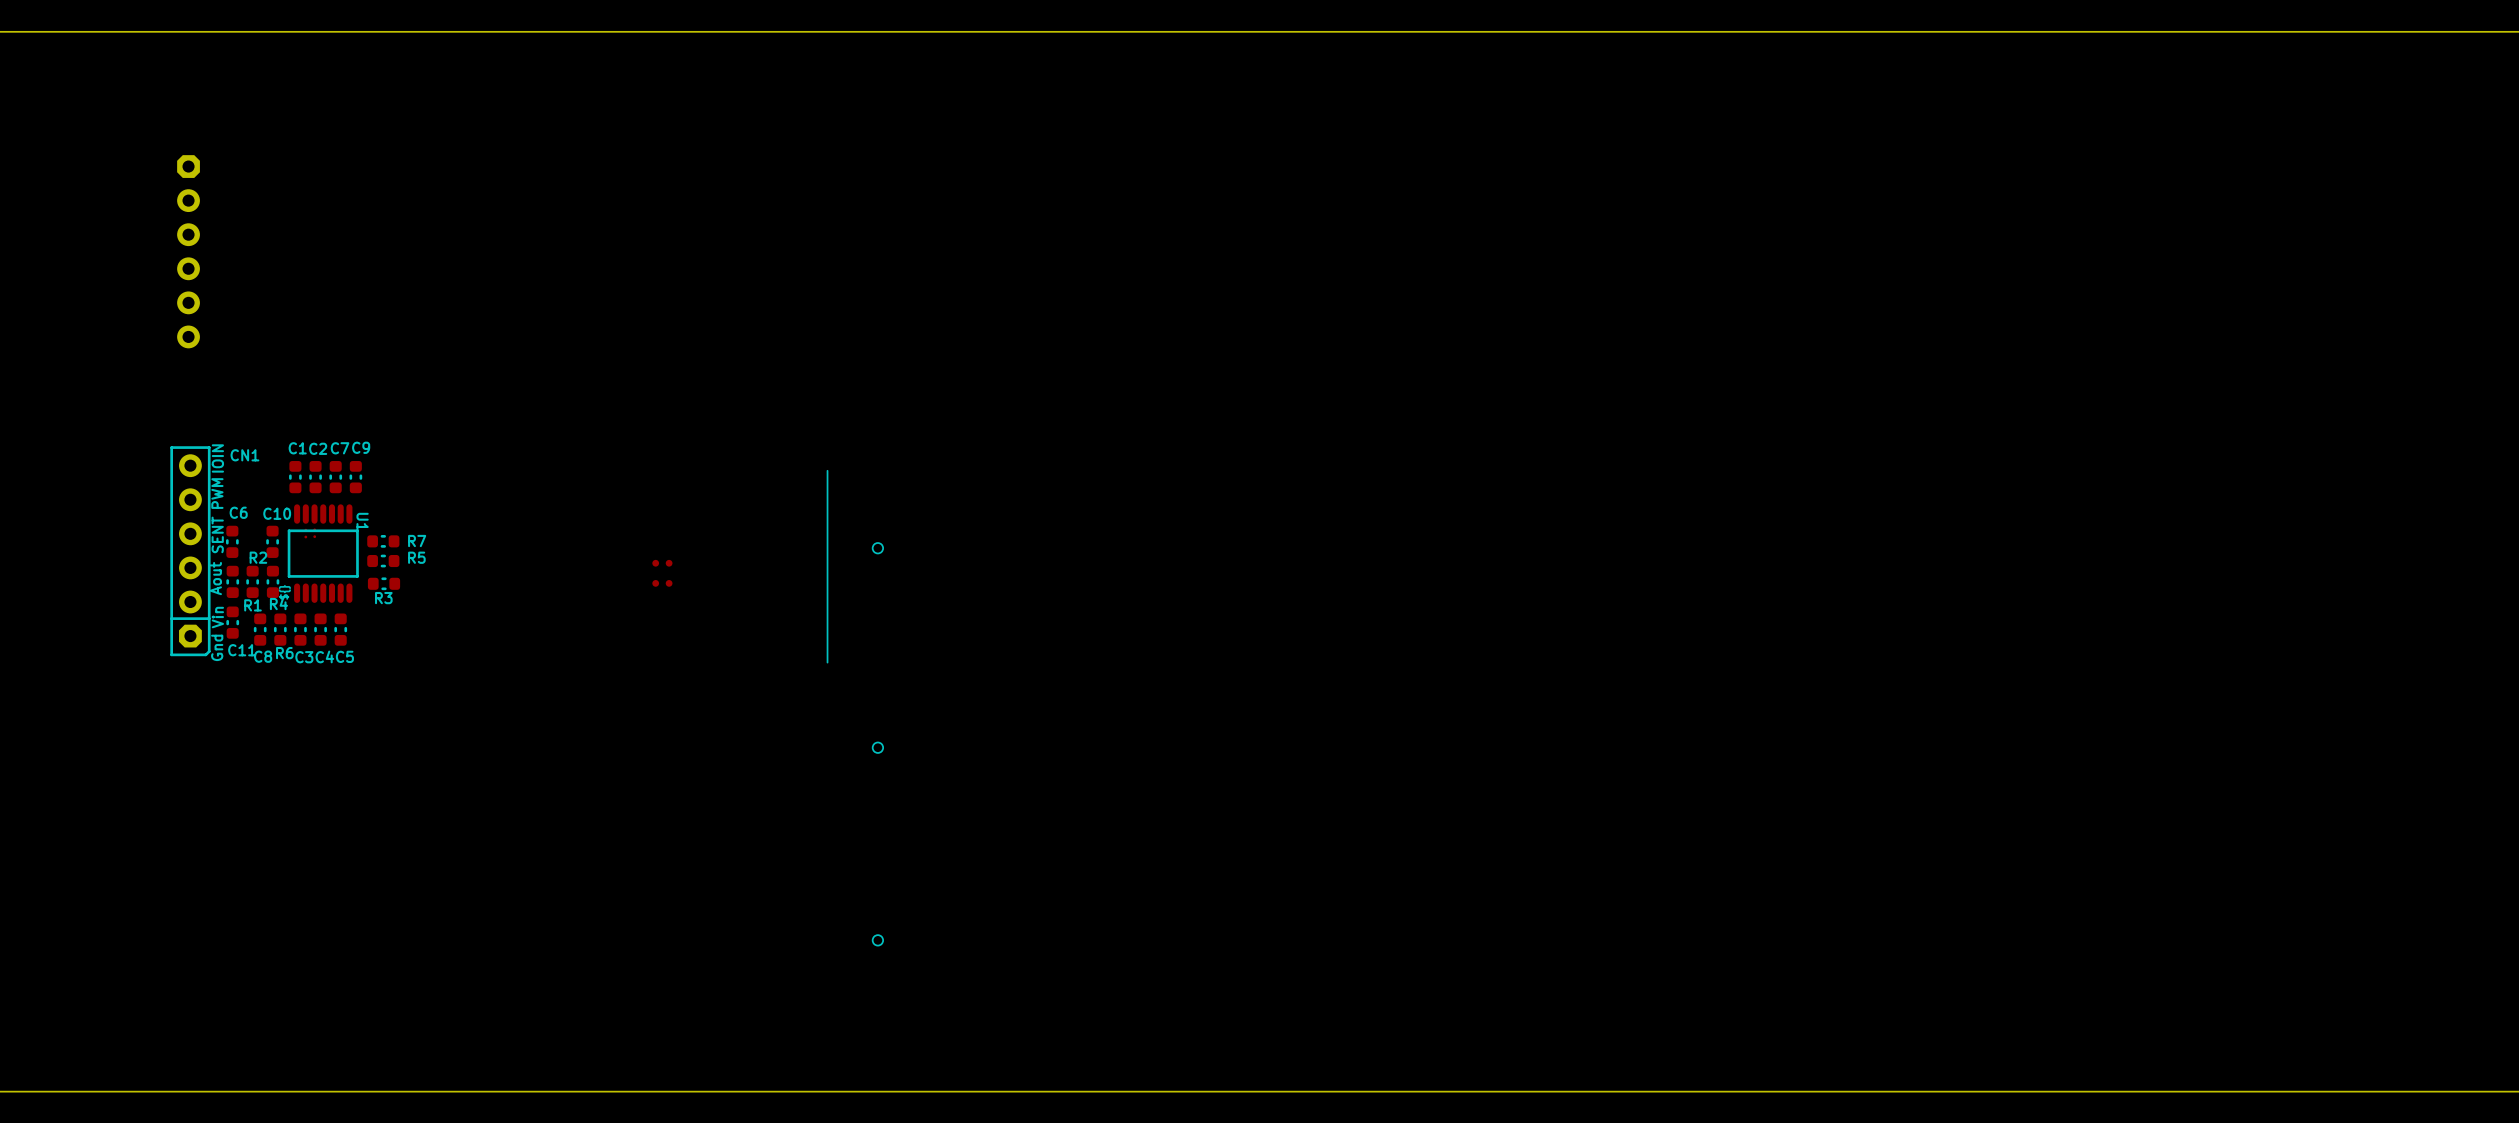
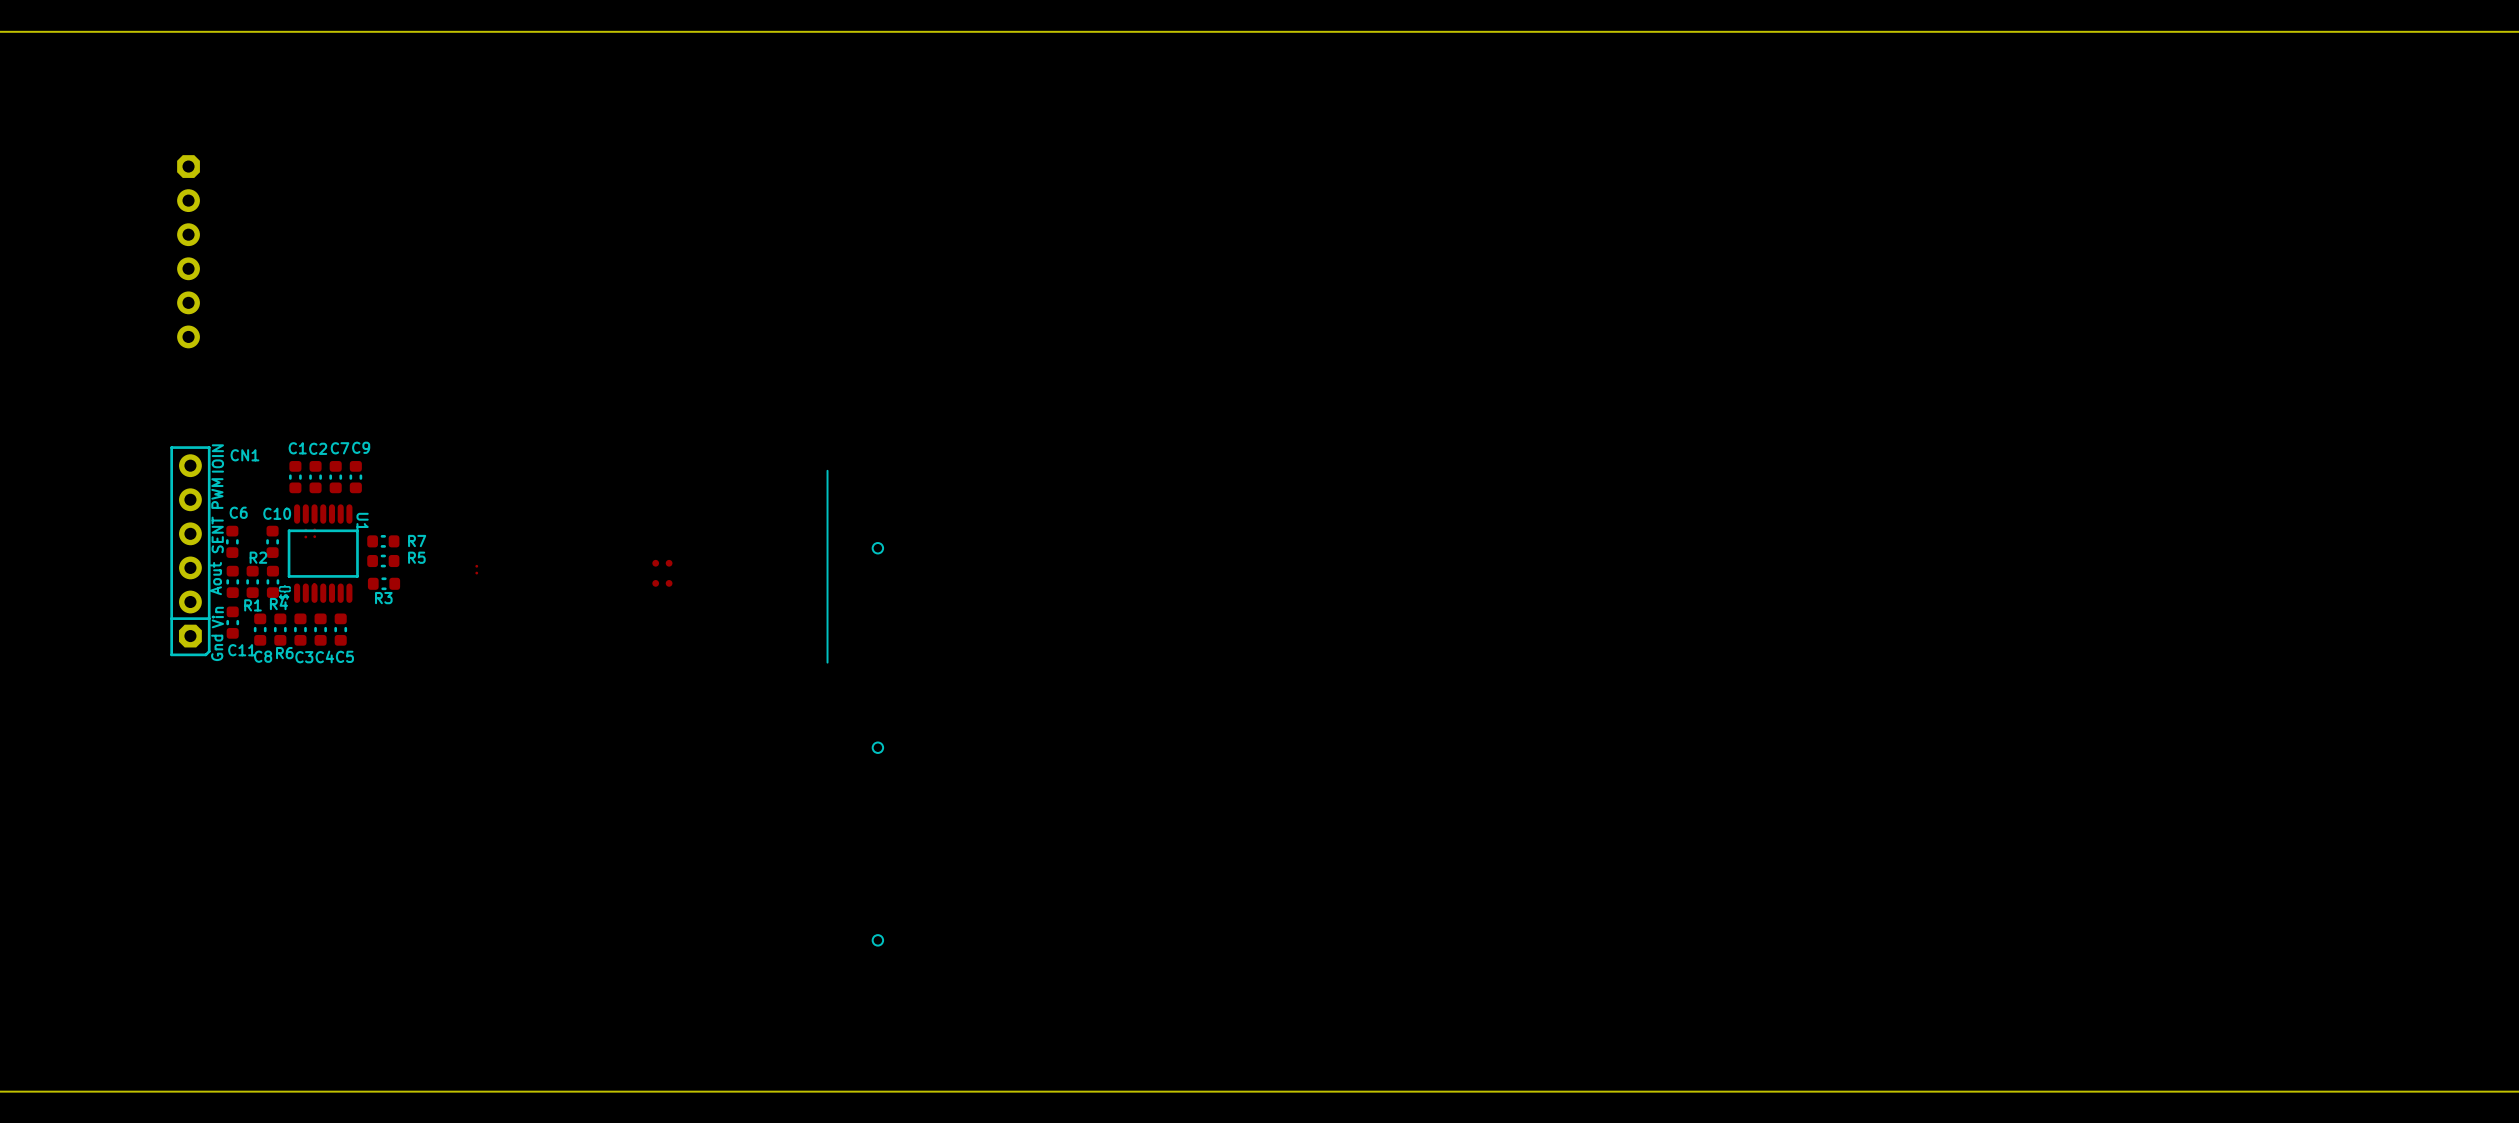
part: none -> (476, 569)

